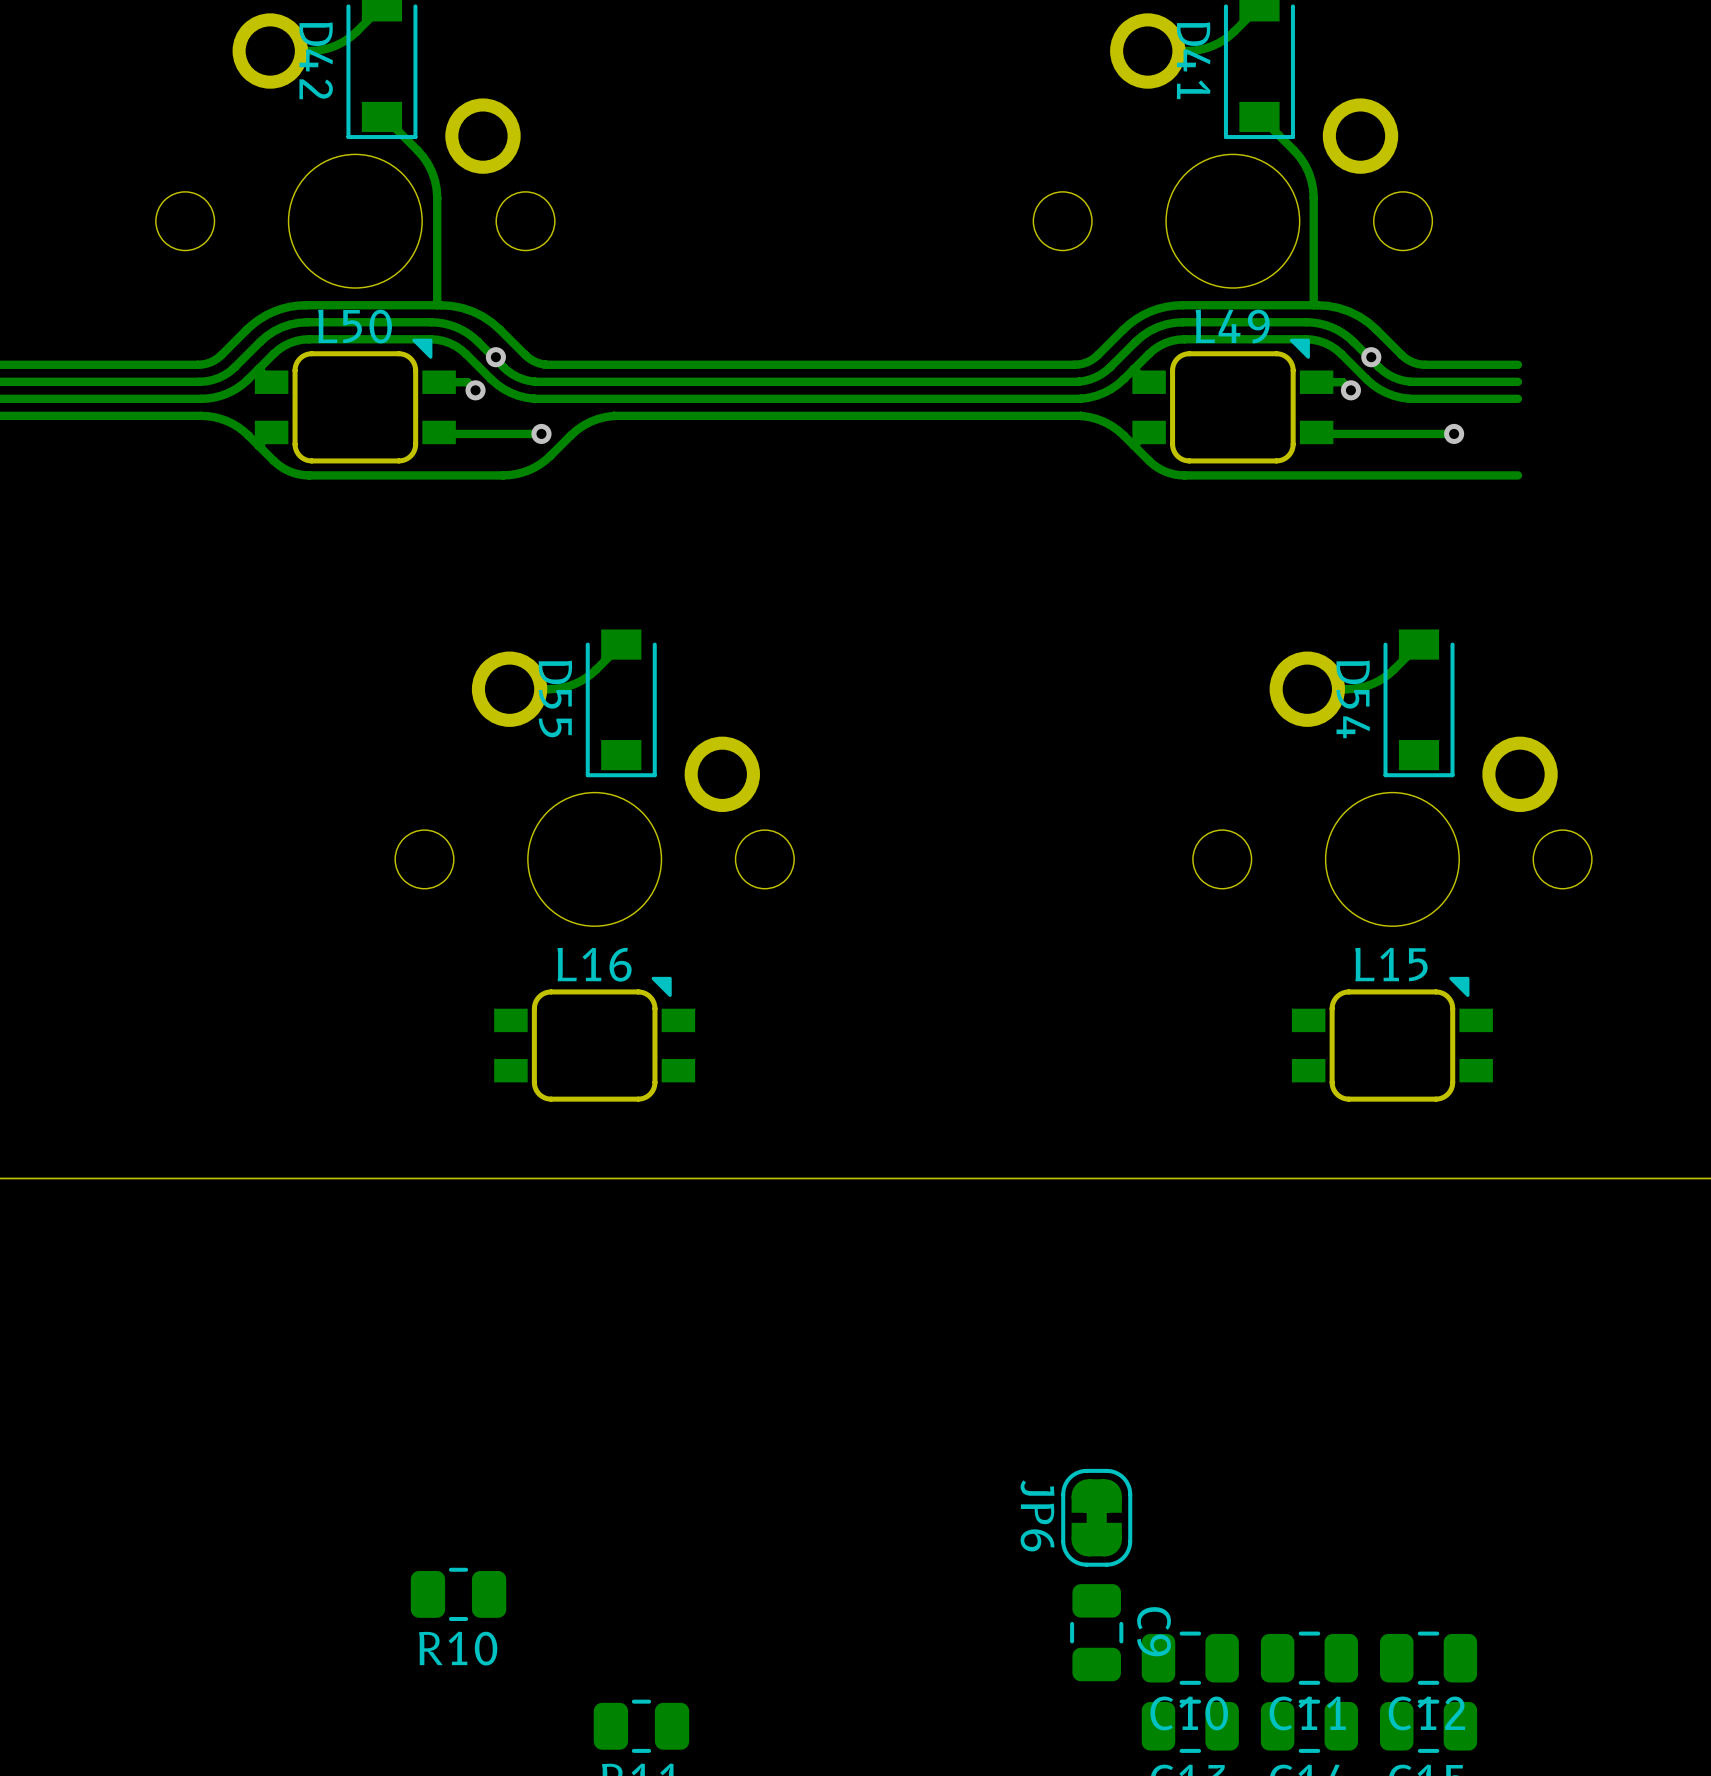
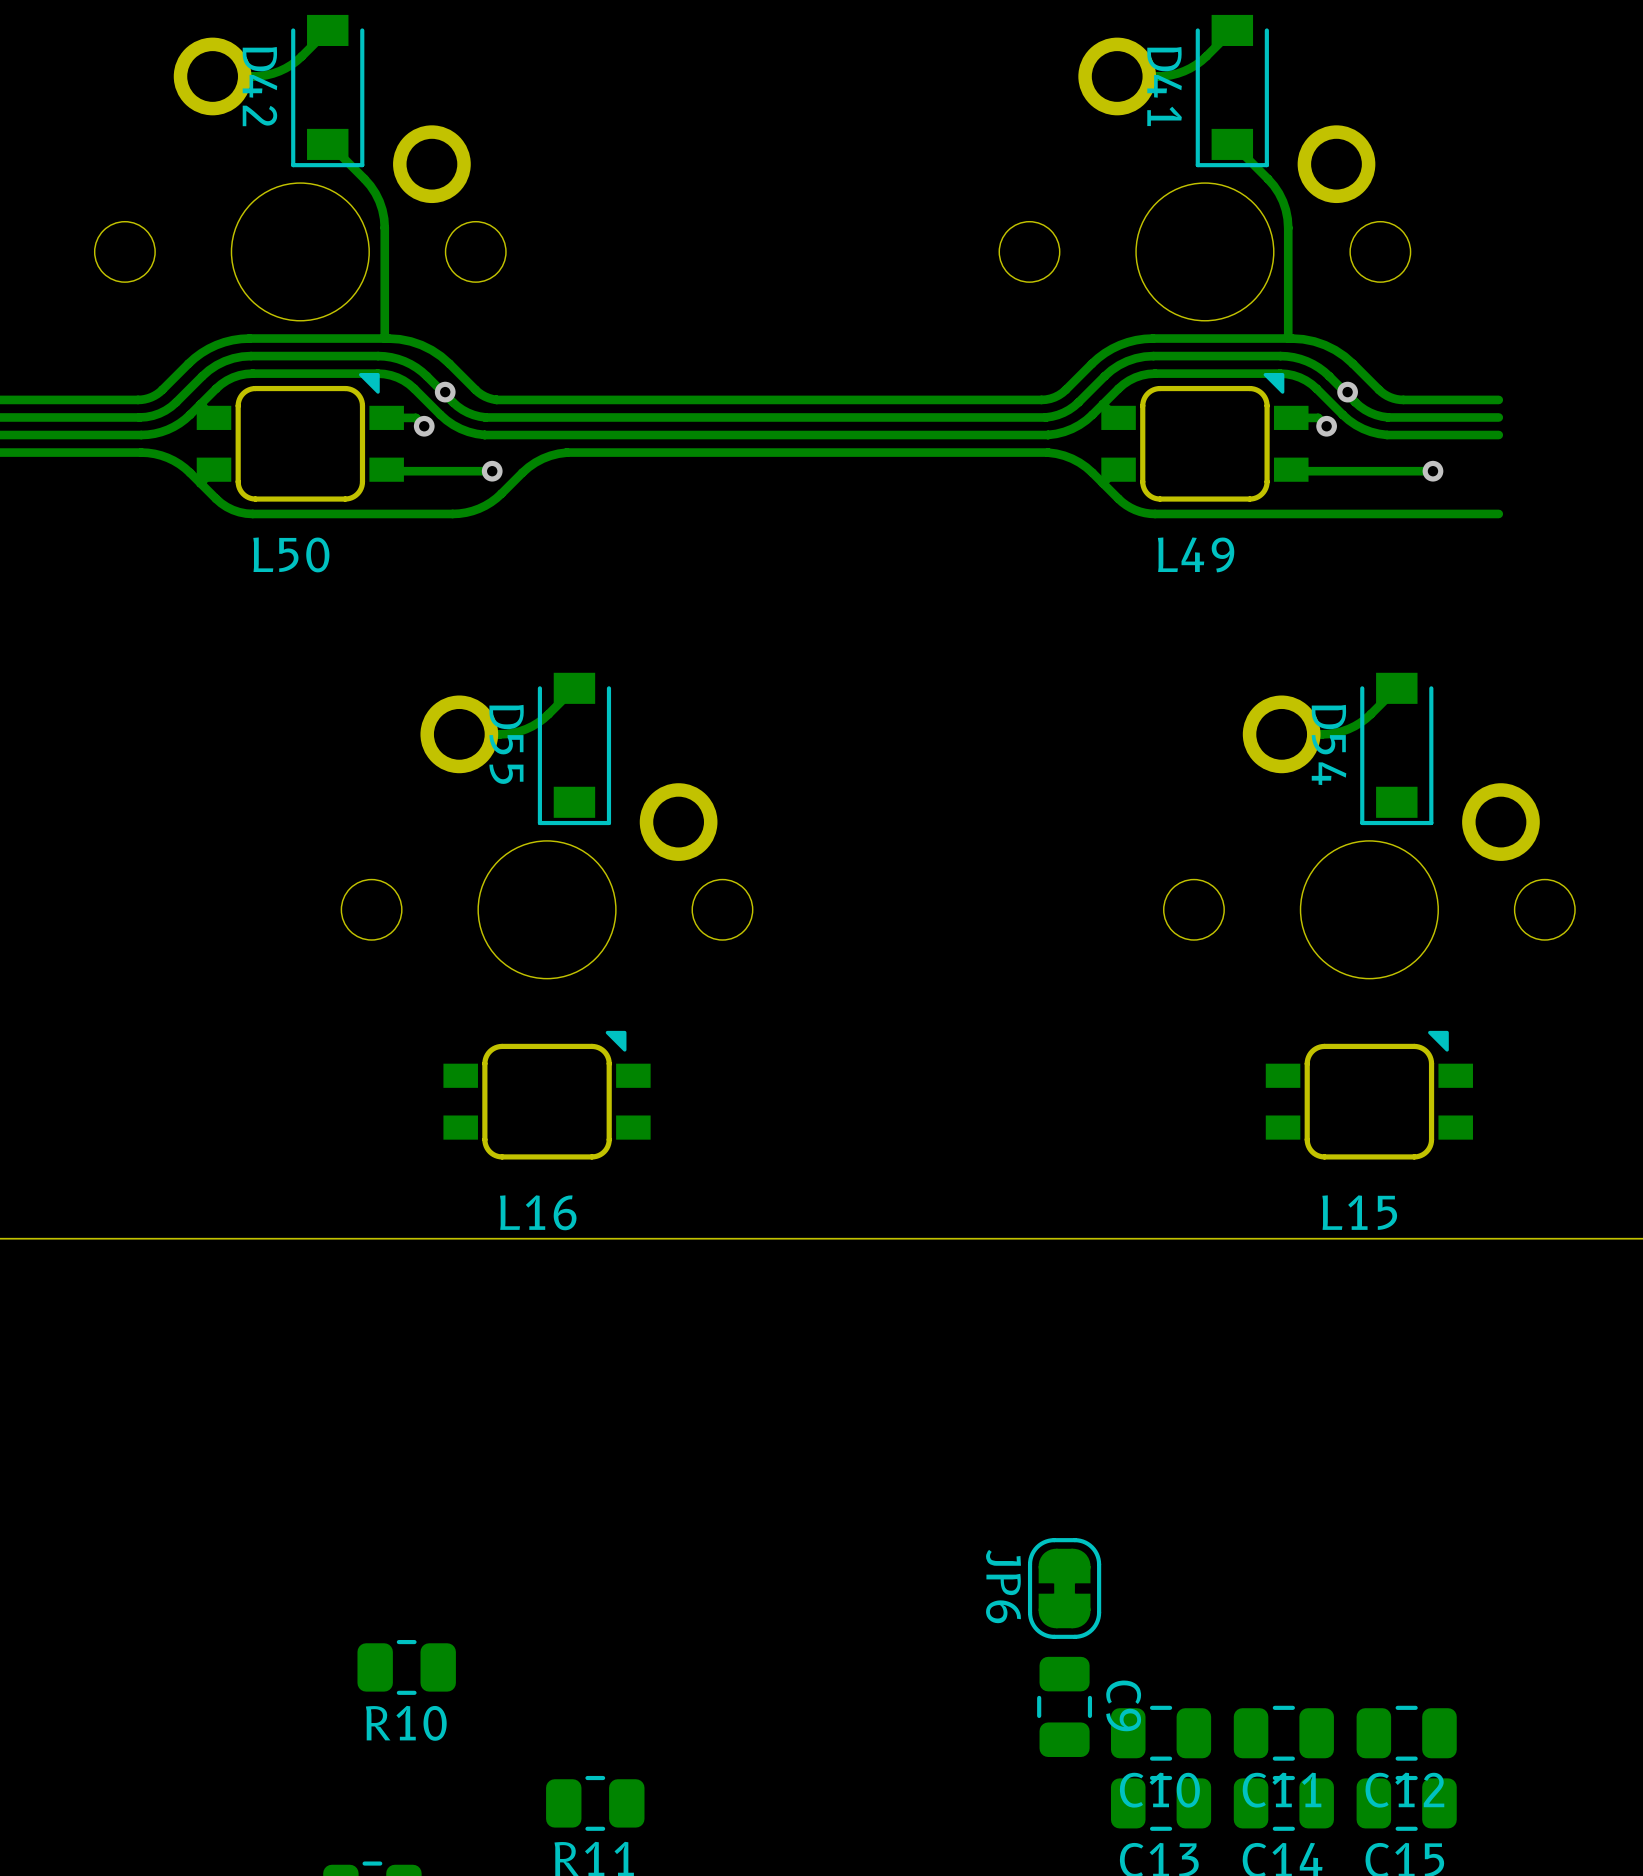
L50 name position: L50 (355, 326) -> L50 (291, 554)
L49 name position: L49 (1232, 326) -> L49 (1196, 554)
L16 name position: L16 (594, 964) -> L16 (538, 1212)
L15 name position: L15 (1391, 964) -> L15 (1359, 1212)

